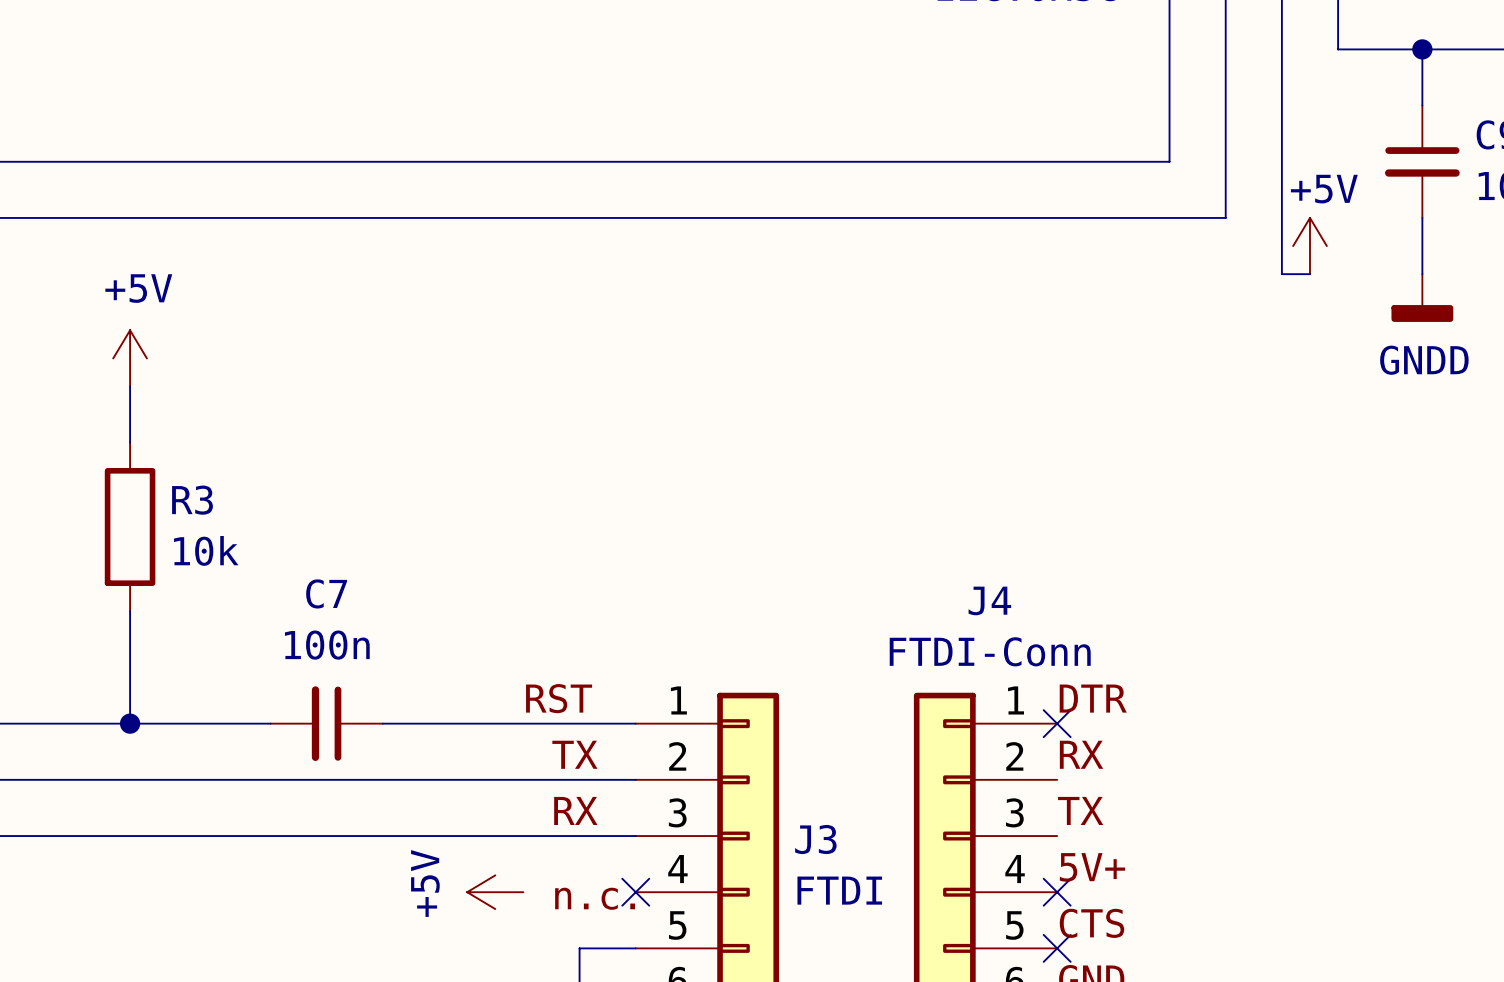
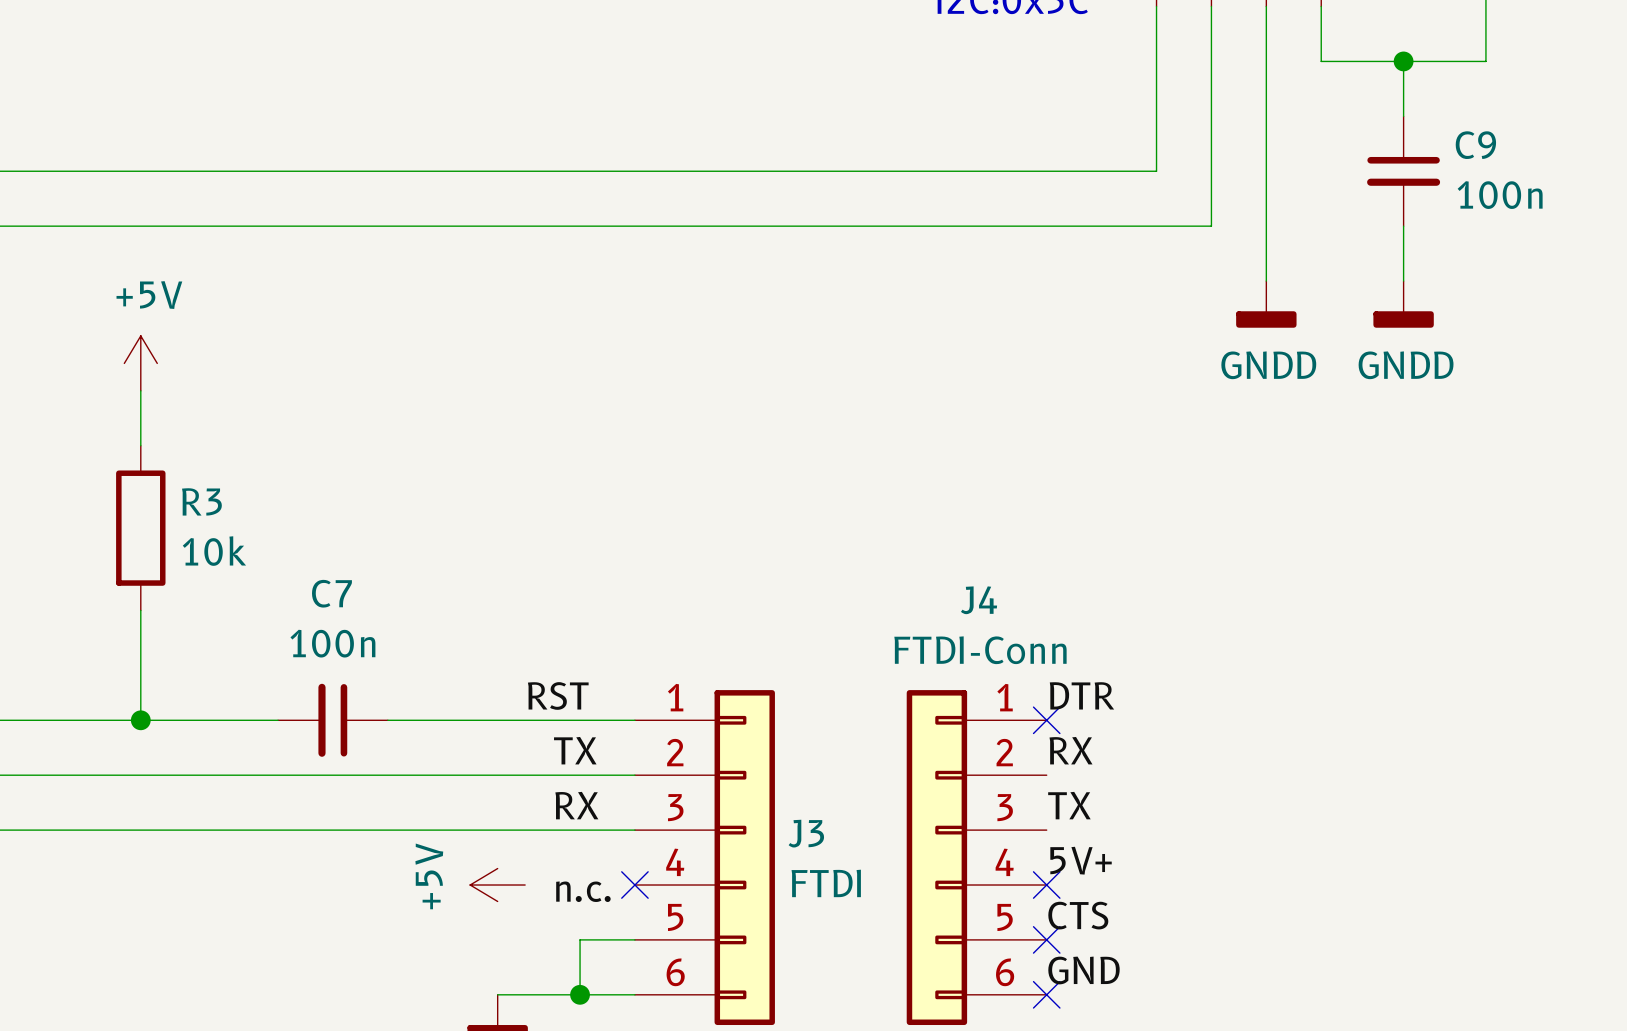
power symbol: +5V (1310, 246) -> none
wire: (1281, 274) (1310, 274) -> none
power symbol: none -> GNDD (1266, 304)

